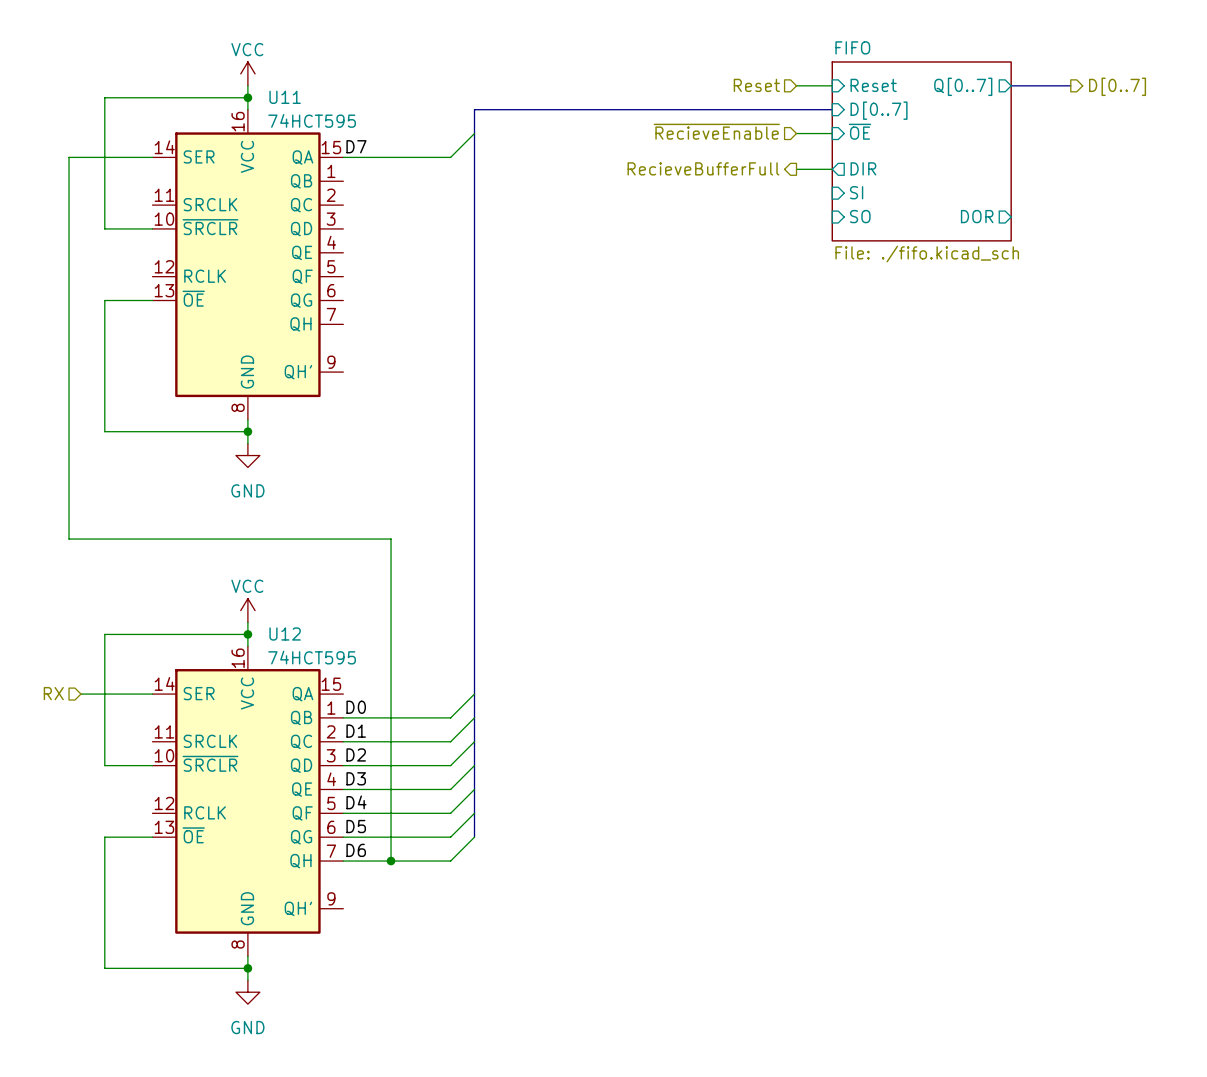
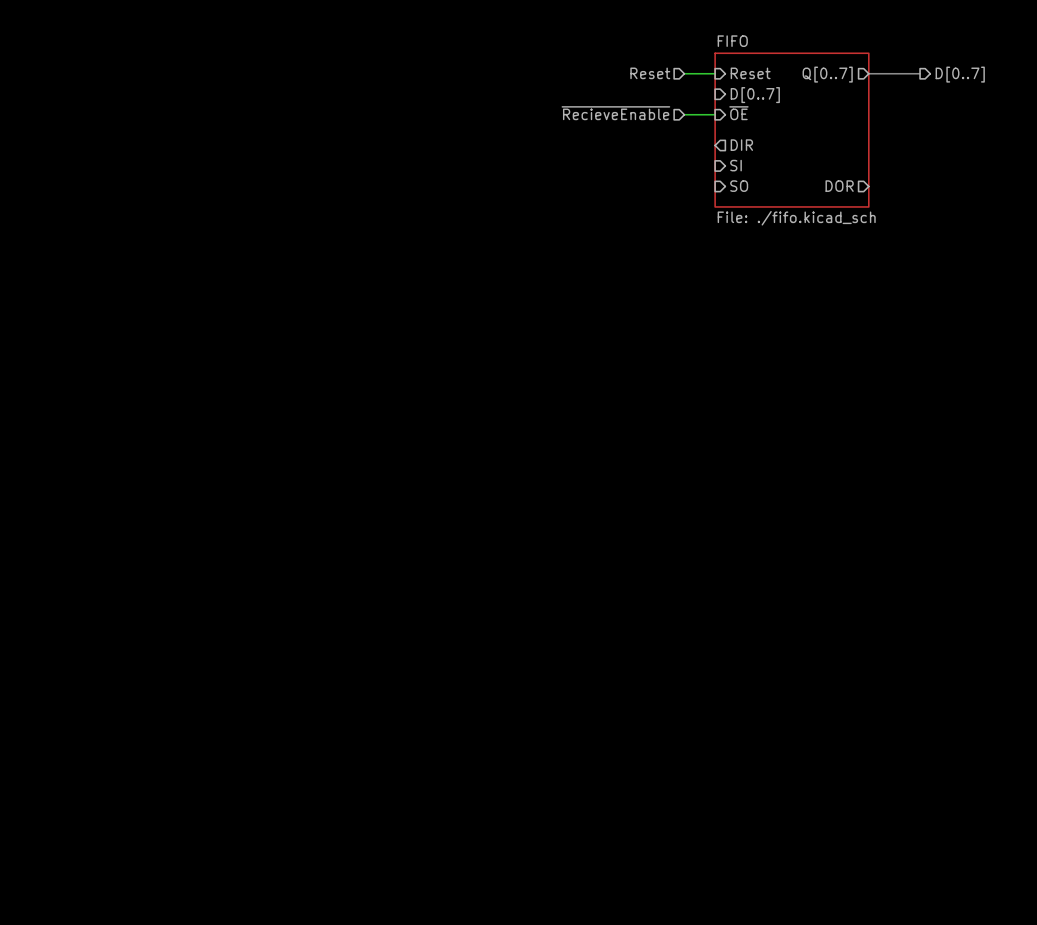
power symbol: VCC (247, 73) -> none
wire: (247, 85) (247, 109) -> none
wire: (247, 97) (104, 97) (104, 228) (152, 228) -> none
junction: (247, 97) -> none
bus: (832, 109) (474, 109) (474, 837) -> none
wire: (474, 133) (450, 157) (343, 157) -> none
label: D7 (356, 146) -> none
wire: (152, 157) (69, 157) (69, 539) (391, 539) (391, 861) -> none
hierarchical label: RecieveBufferFull (703, 168) -> none
wire: (796, 169) (832, 169) -> none
U11: 74HCT595 (247, 264) -> none
wire: (152, 300) (104, 300) (104, 431) (247, 431) -> none
wire: (247, 419) (247, 443) -> none
junction: (247, 431) -> none
power symbol: GND (247, 455) -> none
power symbol: VCC (247, 610) -> none
wire: (247, 622) (247, 646) -> none
wire: (247, 634) (104, 634) (104, 765) (152, 765) -> none
junction: (247, 634) -> none
hierarchical label: RX (53, 693) -> none
wire: (80, 694) (152, 694) -> none
wire: (474, 694) (450, 717) (343, 717) -> none
label: D0 (356, 707) -> none
wire: (474, 717) (450, 741) (343, 741) -> none
label: D1 (356, 731) -> none
wire: (474, 741) (450, 765) (343, 765) -> none
label: D2 (356, 754) -> none
wire: (474, 765) (450, 789) (343, 789) -> none
label: D3 (356, 778) -> none
wire: (474, 789) (450, 813) (343, 813) -> none
U12: 74HCT595 (247, 801) -> none
label: D4 (356, 802) -> none
wire: (474, 813) (450, 837) (343, 837) -> none
label: D5 (356, 826) -> none
wire: (152, 837) (104, 837) (104, 968) (247, 968) -> none
wire: (474, 837) (450, 861) (343, 861) -> none
label: D6 (356, 850) -> none
junction: (391, 861) -> none
wire: (247, 956) (247, 980) -> none
junction: (247, 968) -> none
power symbol: GND (247, 992) -> none

